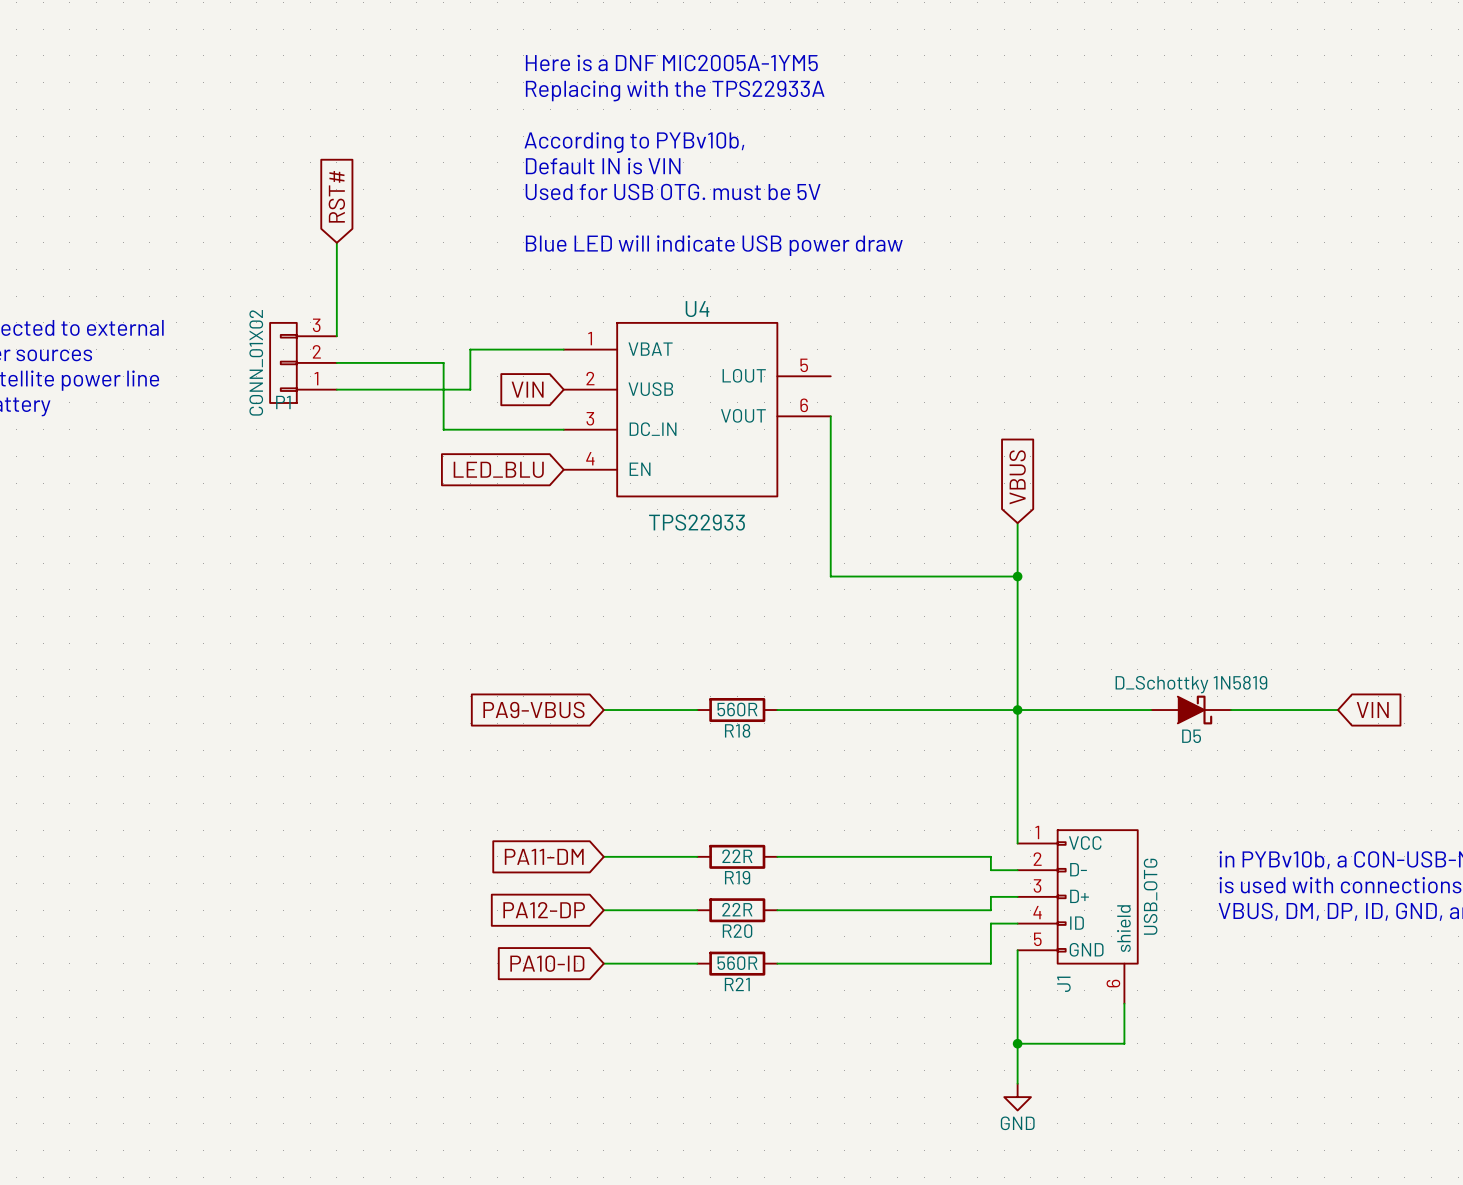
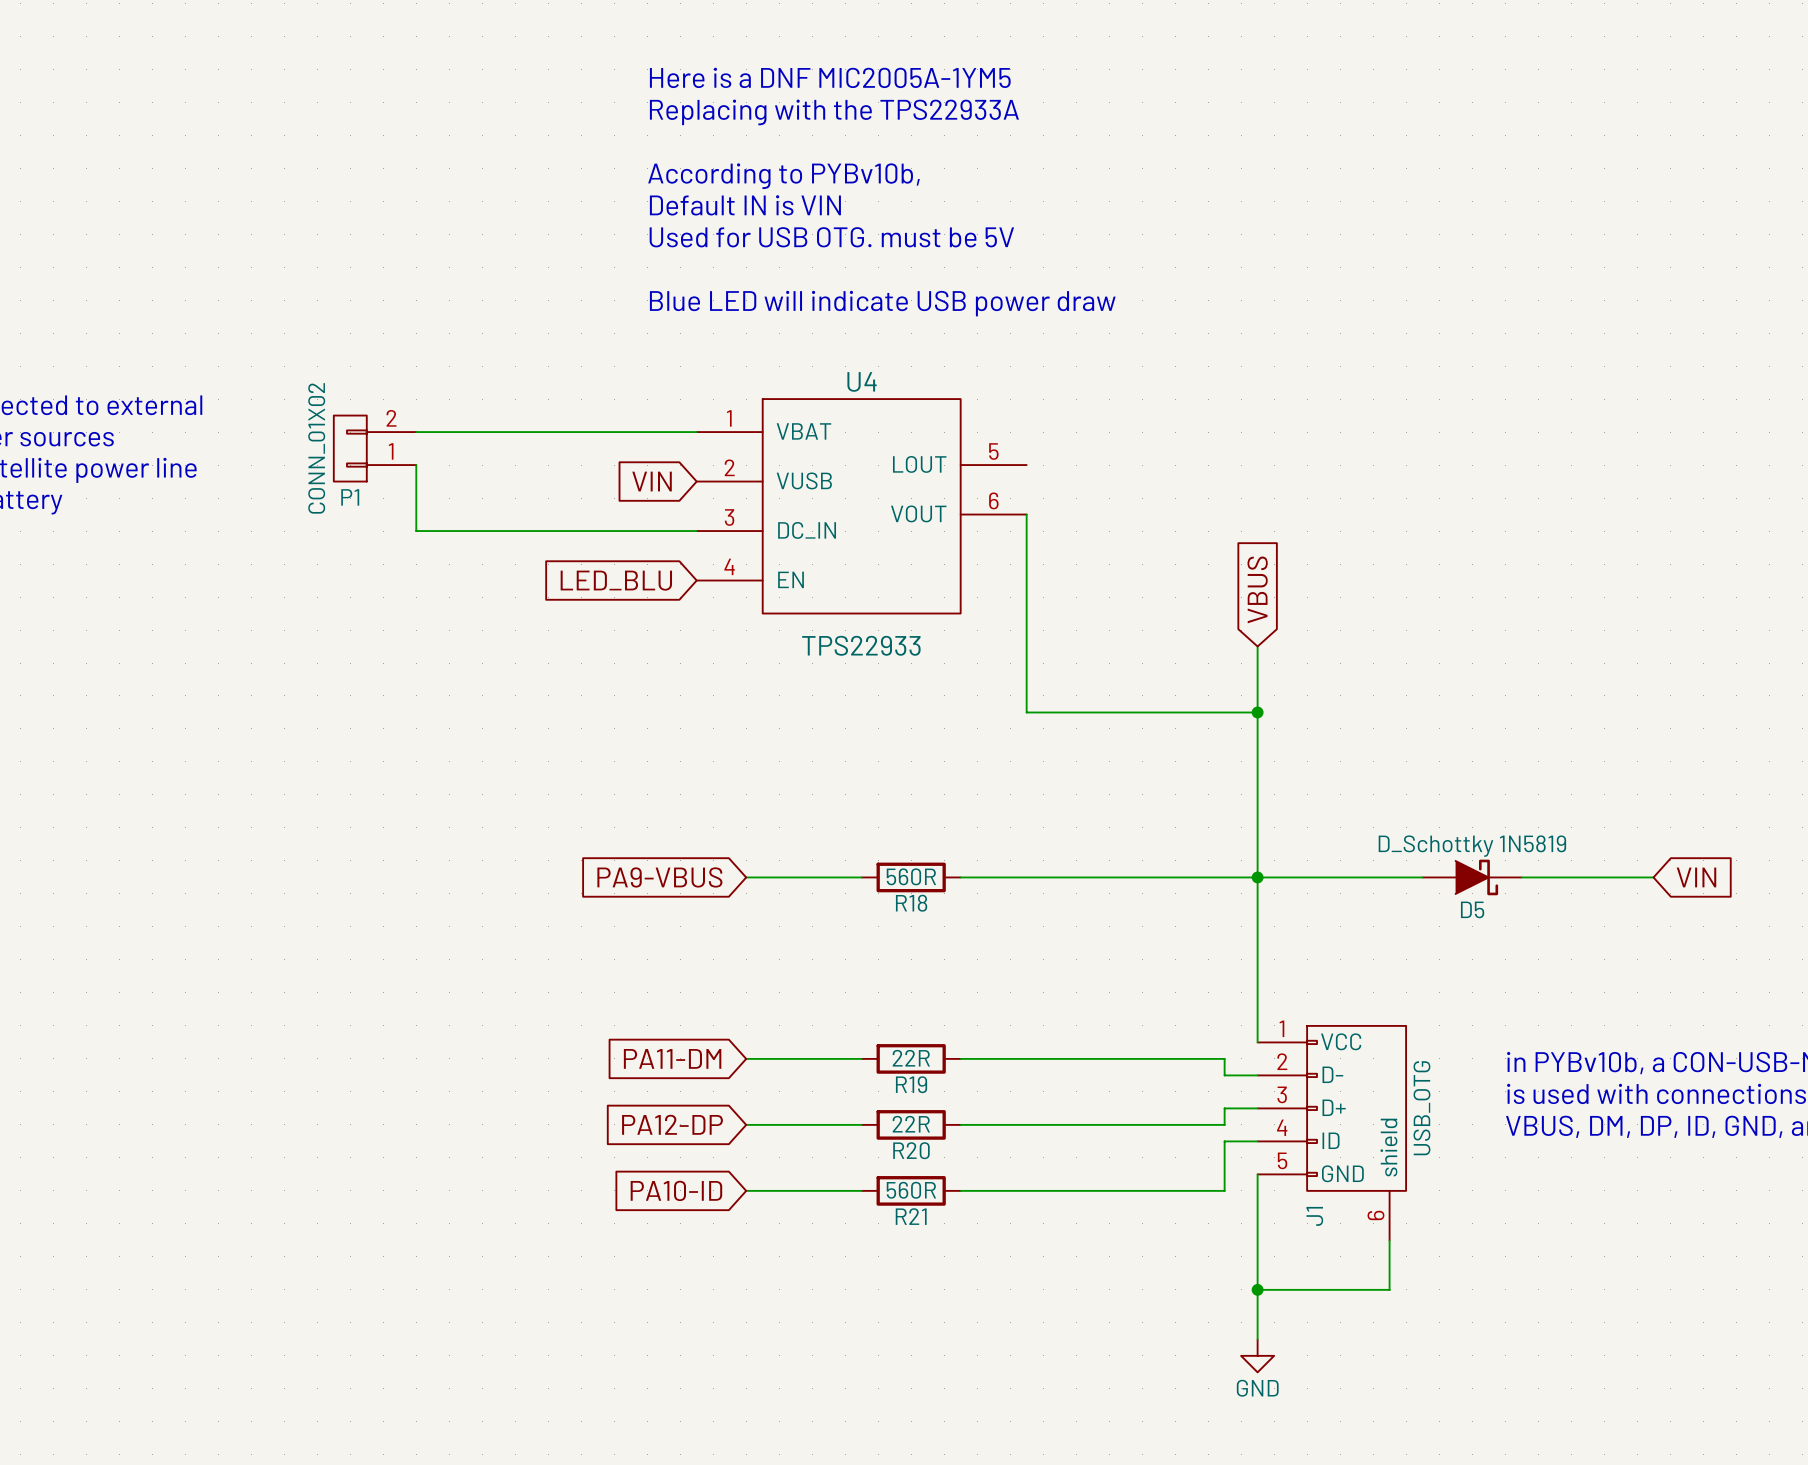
global label: RST# (336, 196) -> none
wire: (336, 242) (336, 336) -> none
P1 symbol: [270, 322, 337, 403] -> [333, 415, 417, 482]
wire: (470, 349) (470, 389) (336, 389) -> (581, 432) (416, 432)
wire: (336, 362) (443, 362) (443, 429) -> (416, 465) (416, 531) (548, 531)

